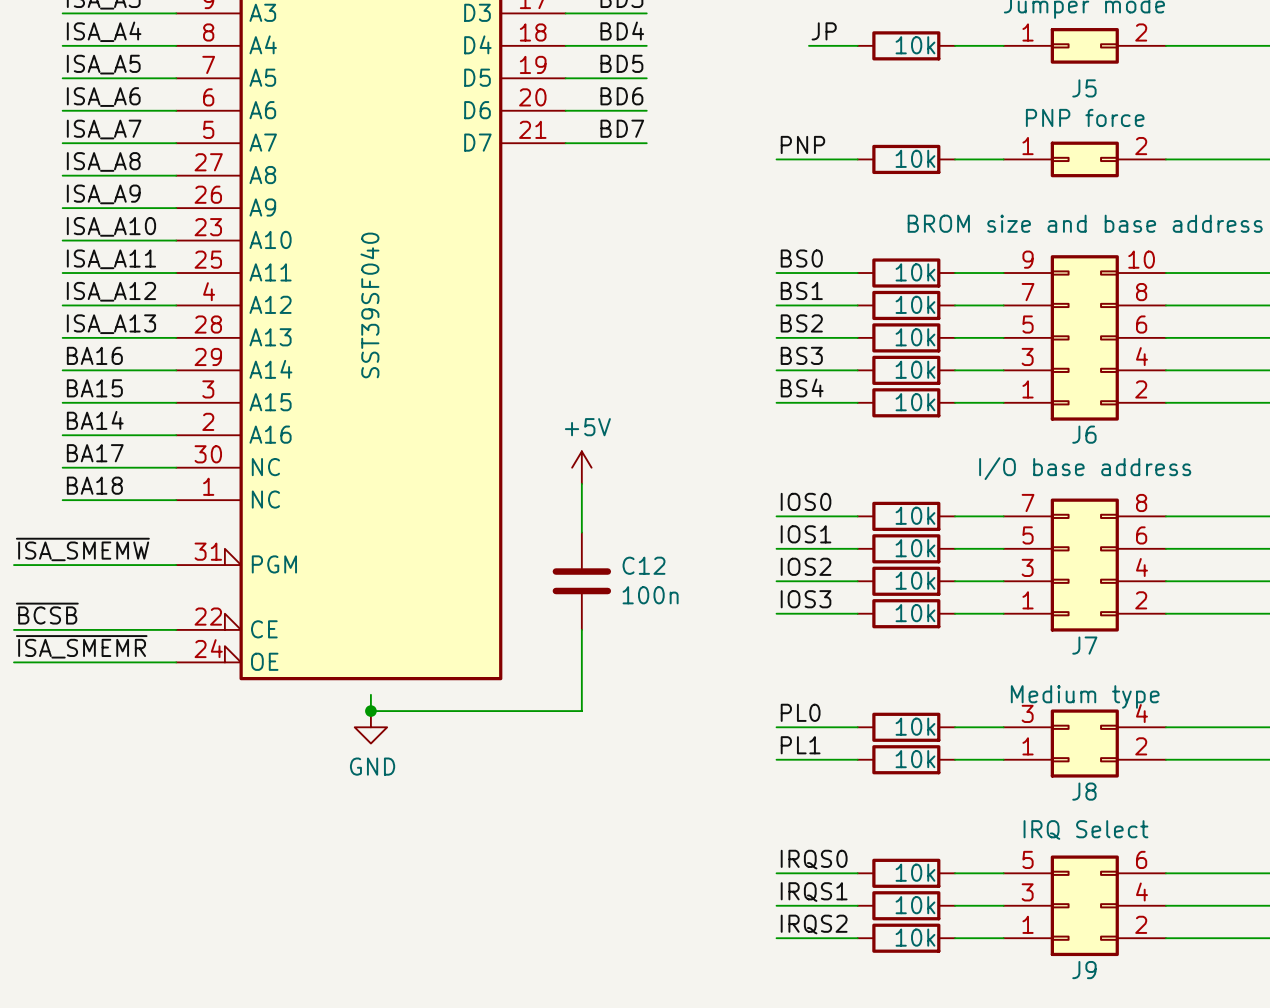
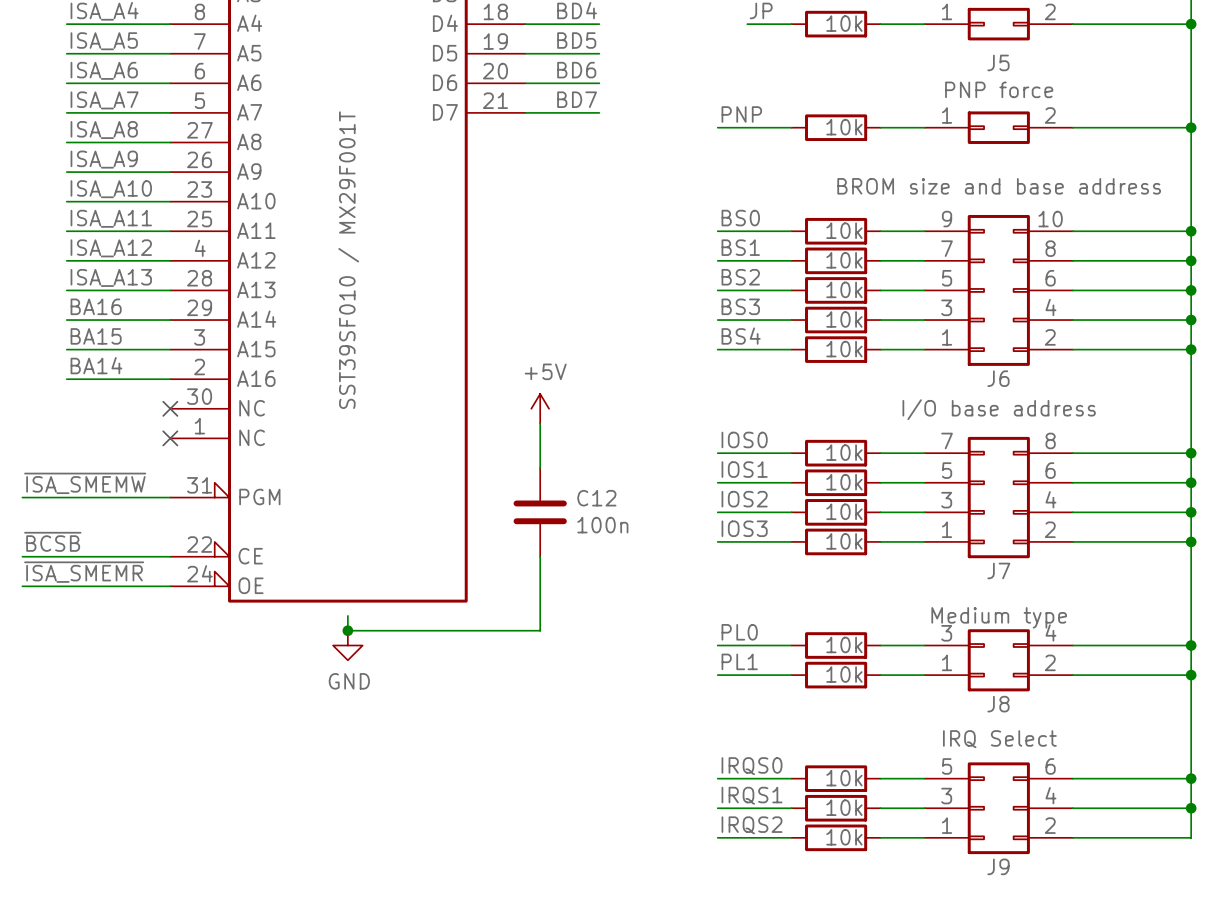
part value: SST39SF040 (369, 305) -> SST39SF010 / MX29F001T (348, 260)
label: BA17 (95, 453) -> none
wire: (62, 467) (176, 467) -> none
no-connect mark: none -> (170, 408)
label: BA18 (94, 485) -> none
wire: (62, 500) (176, 500) -> none
no-connect mark: none -> (170, 438)

